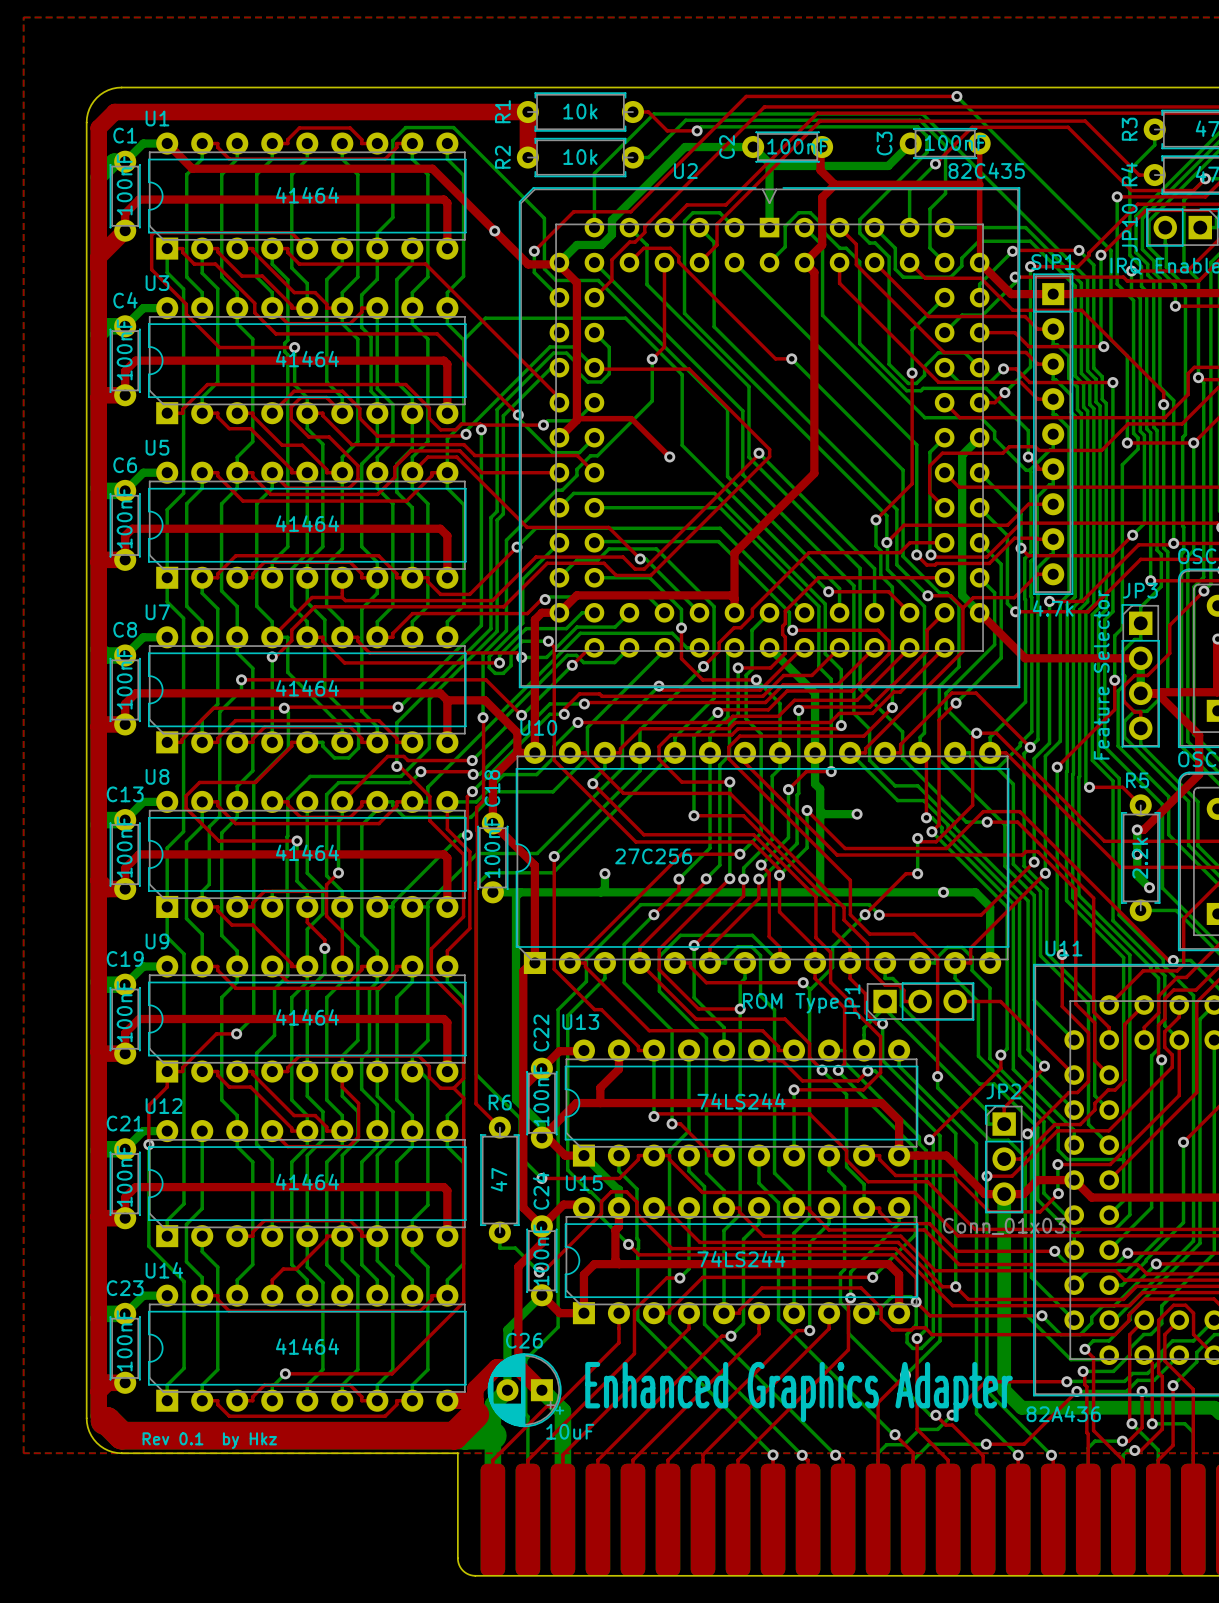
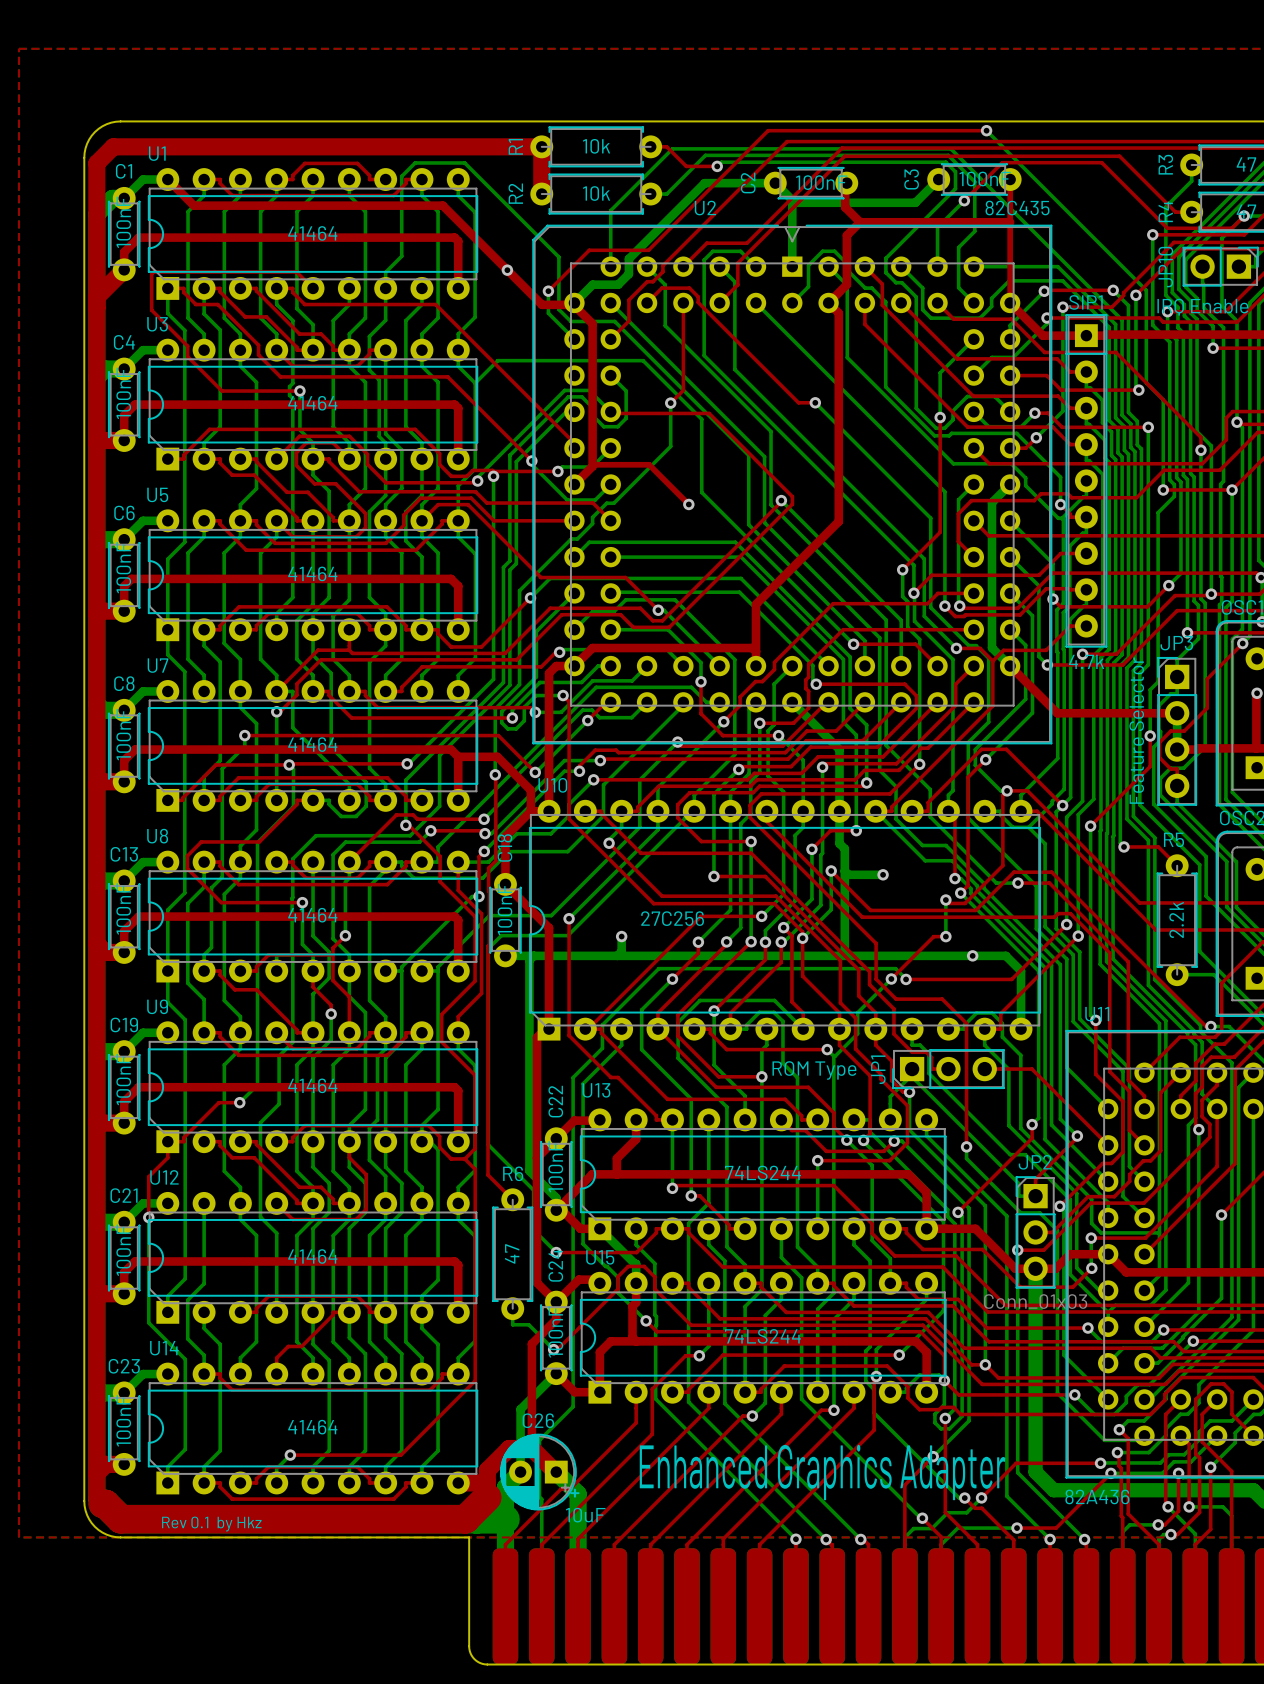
top track: (1157, 693) (1199, 735) (1199, 774) (1143, 829) (1137, 829) -> none
bottom track: (1137, 829) (1137, 875) (1149, 887) -> none
via: (1137, 829) -> none
via: (1137, 854) -> none
via: (1149, 887) -> none

